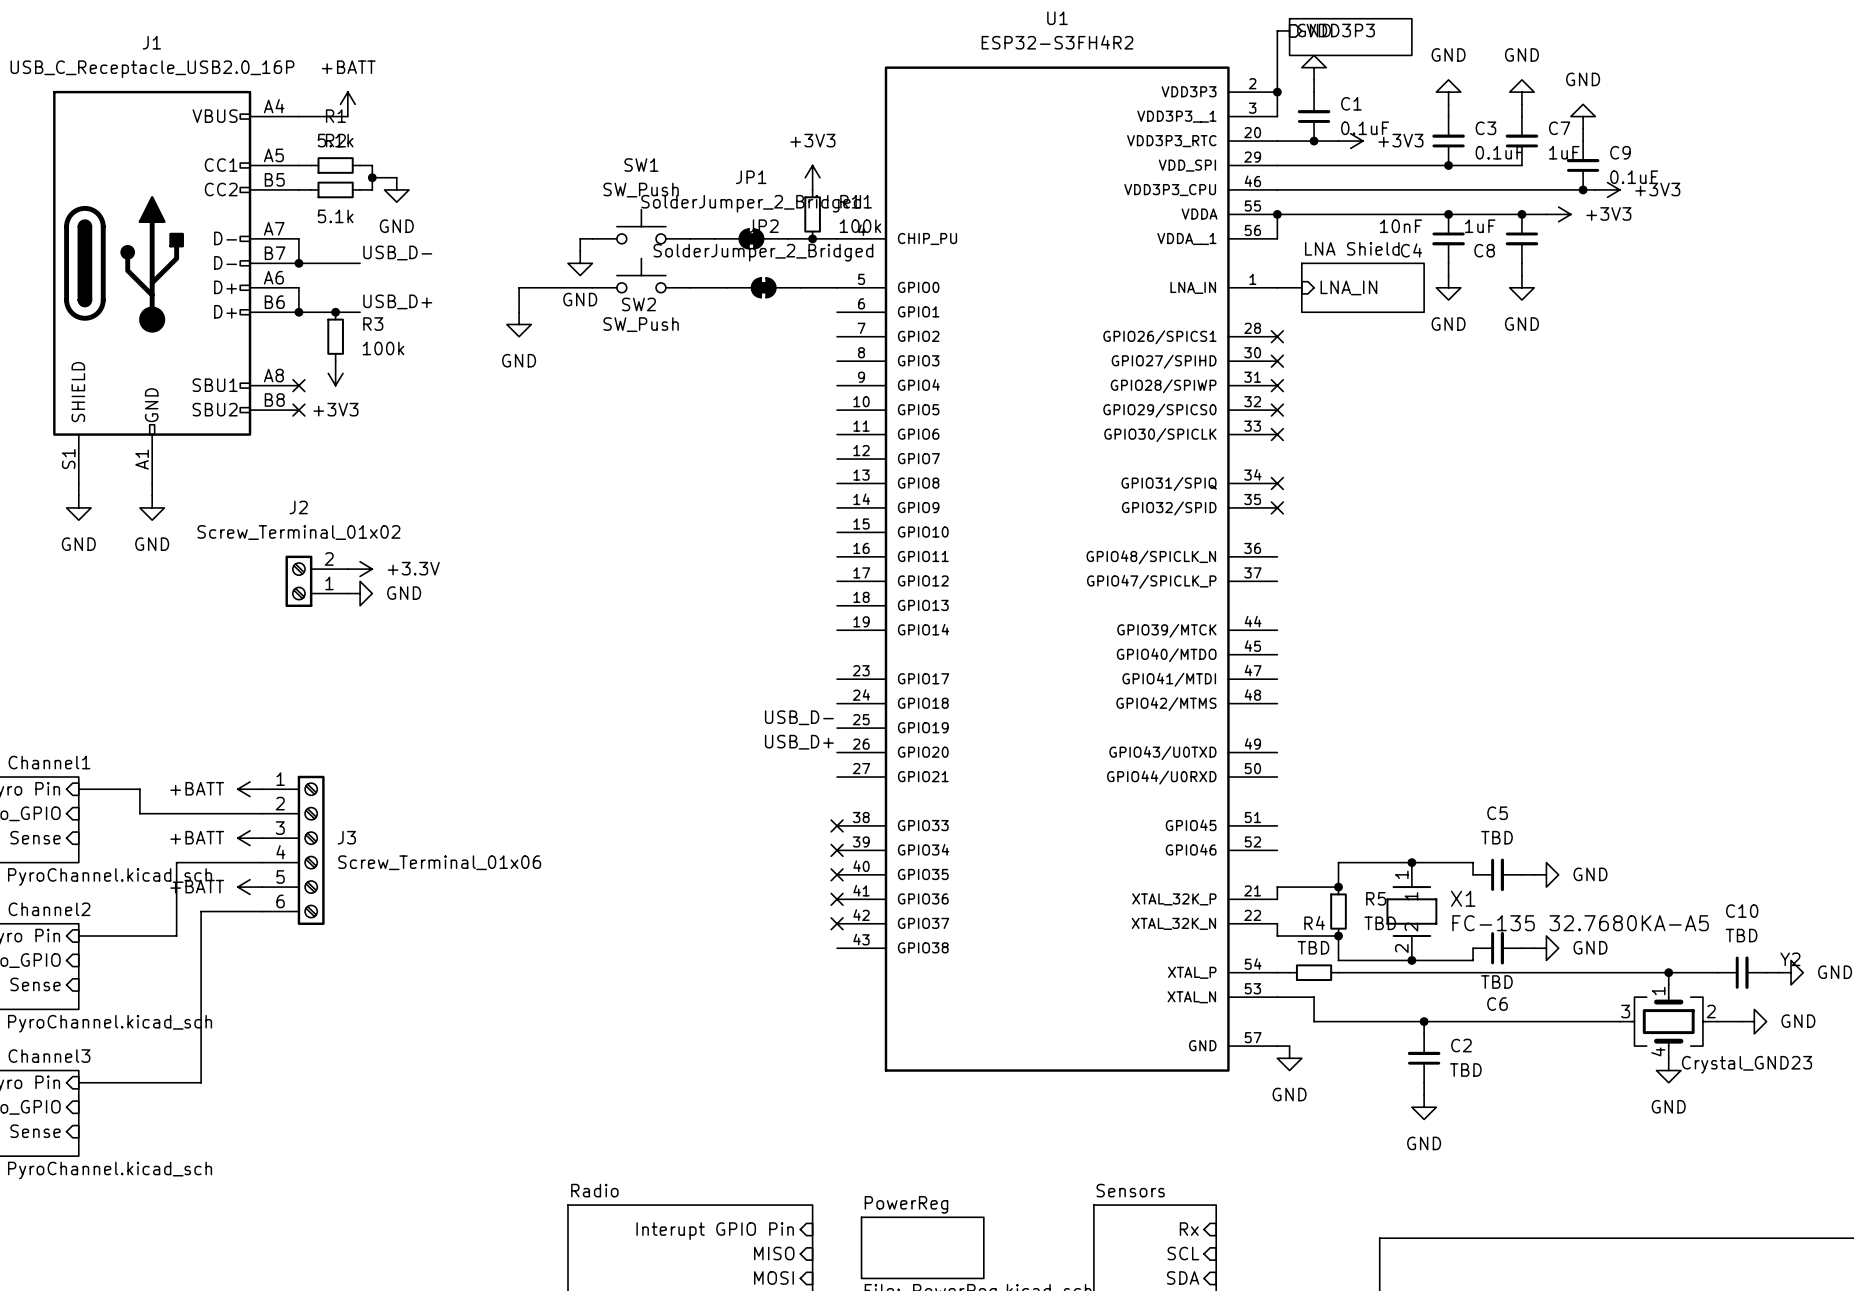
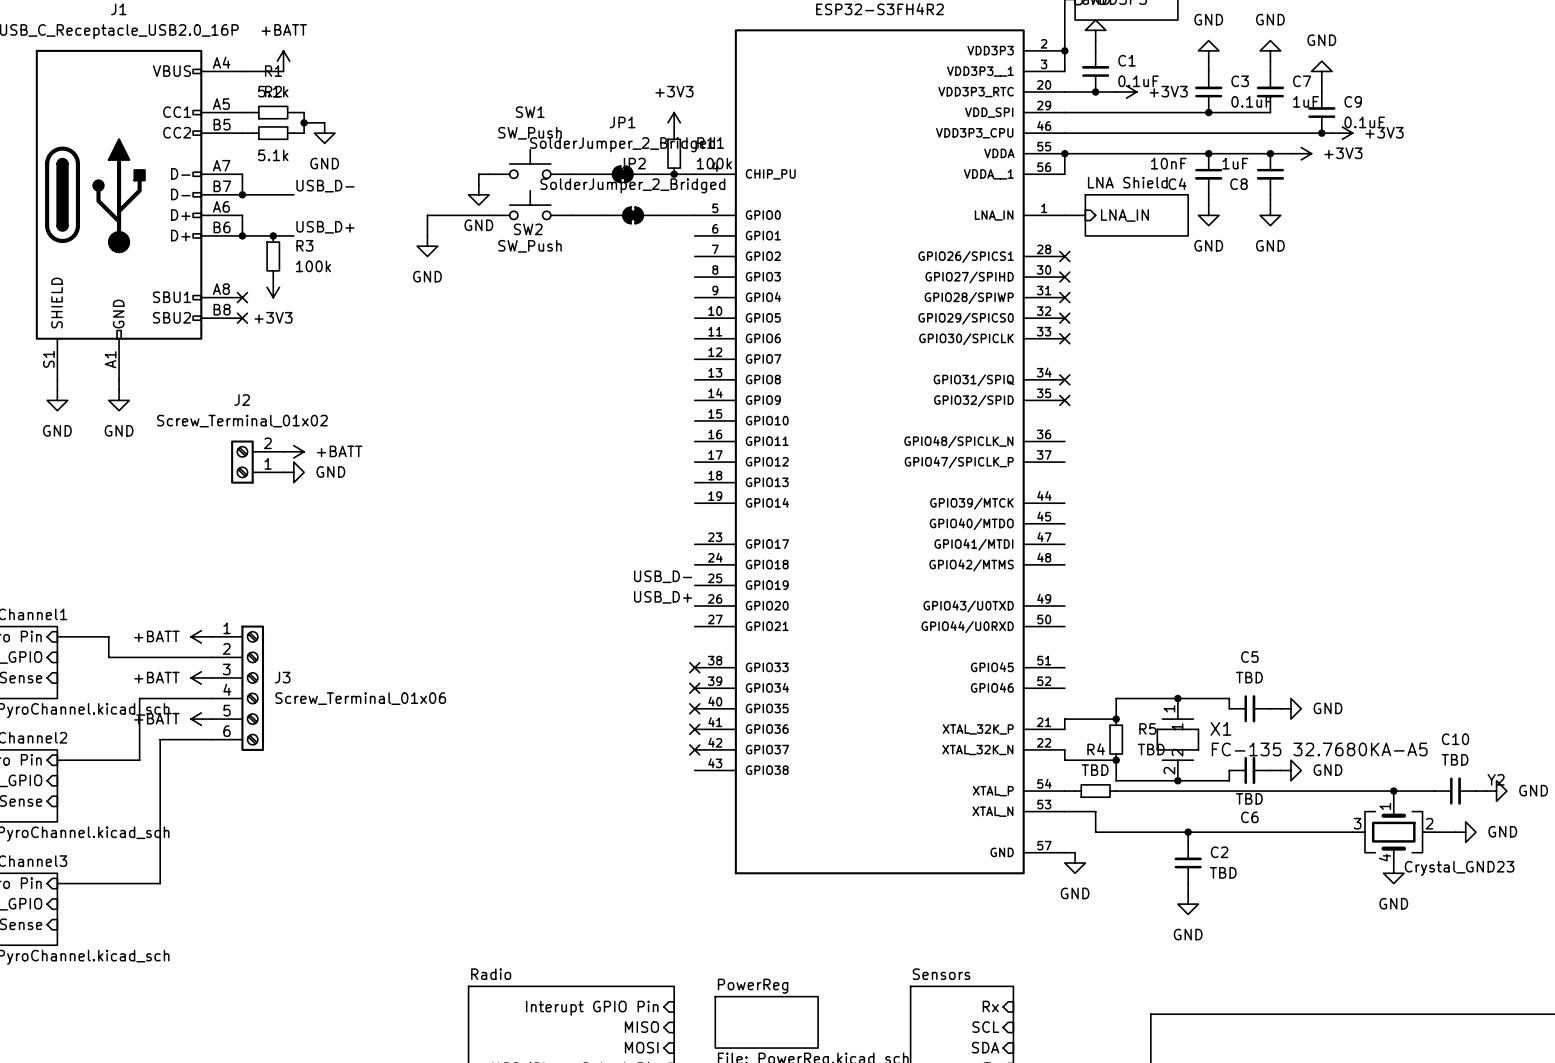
power symbol: +3.3V (360, 569) -> +BATT (293, 451)

